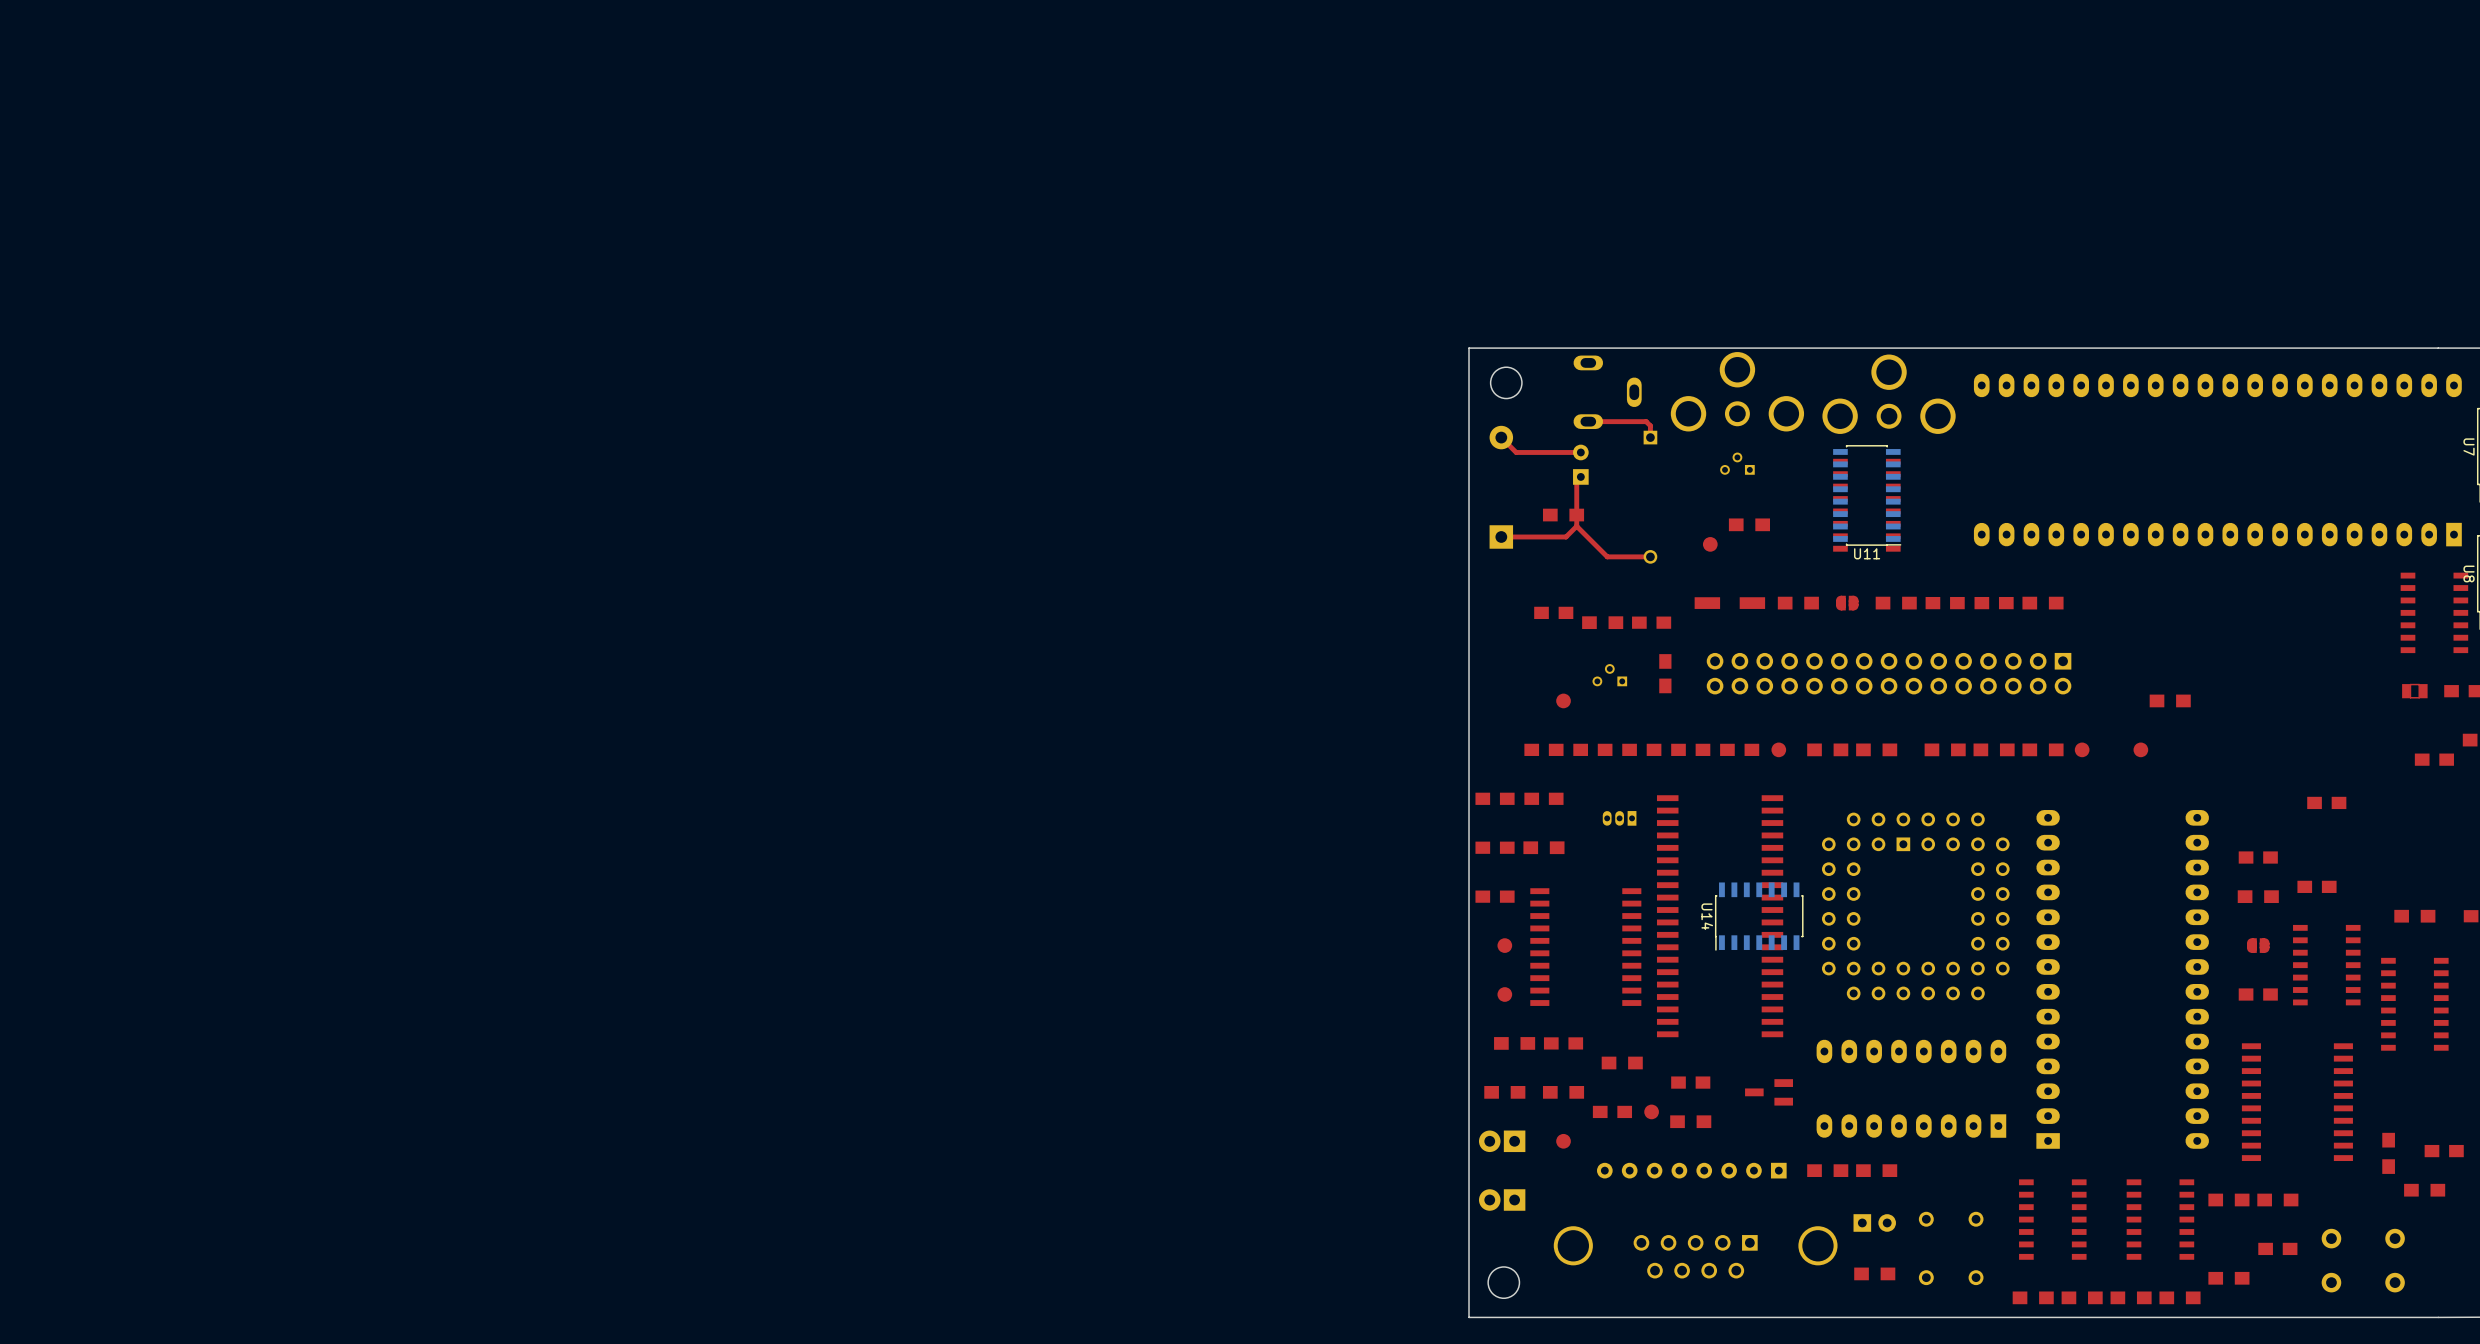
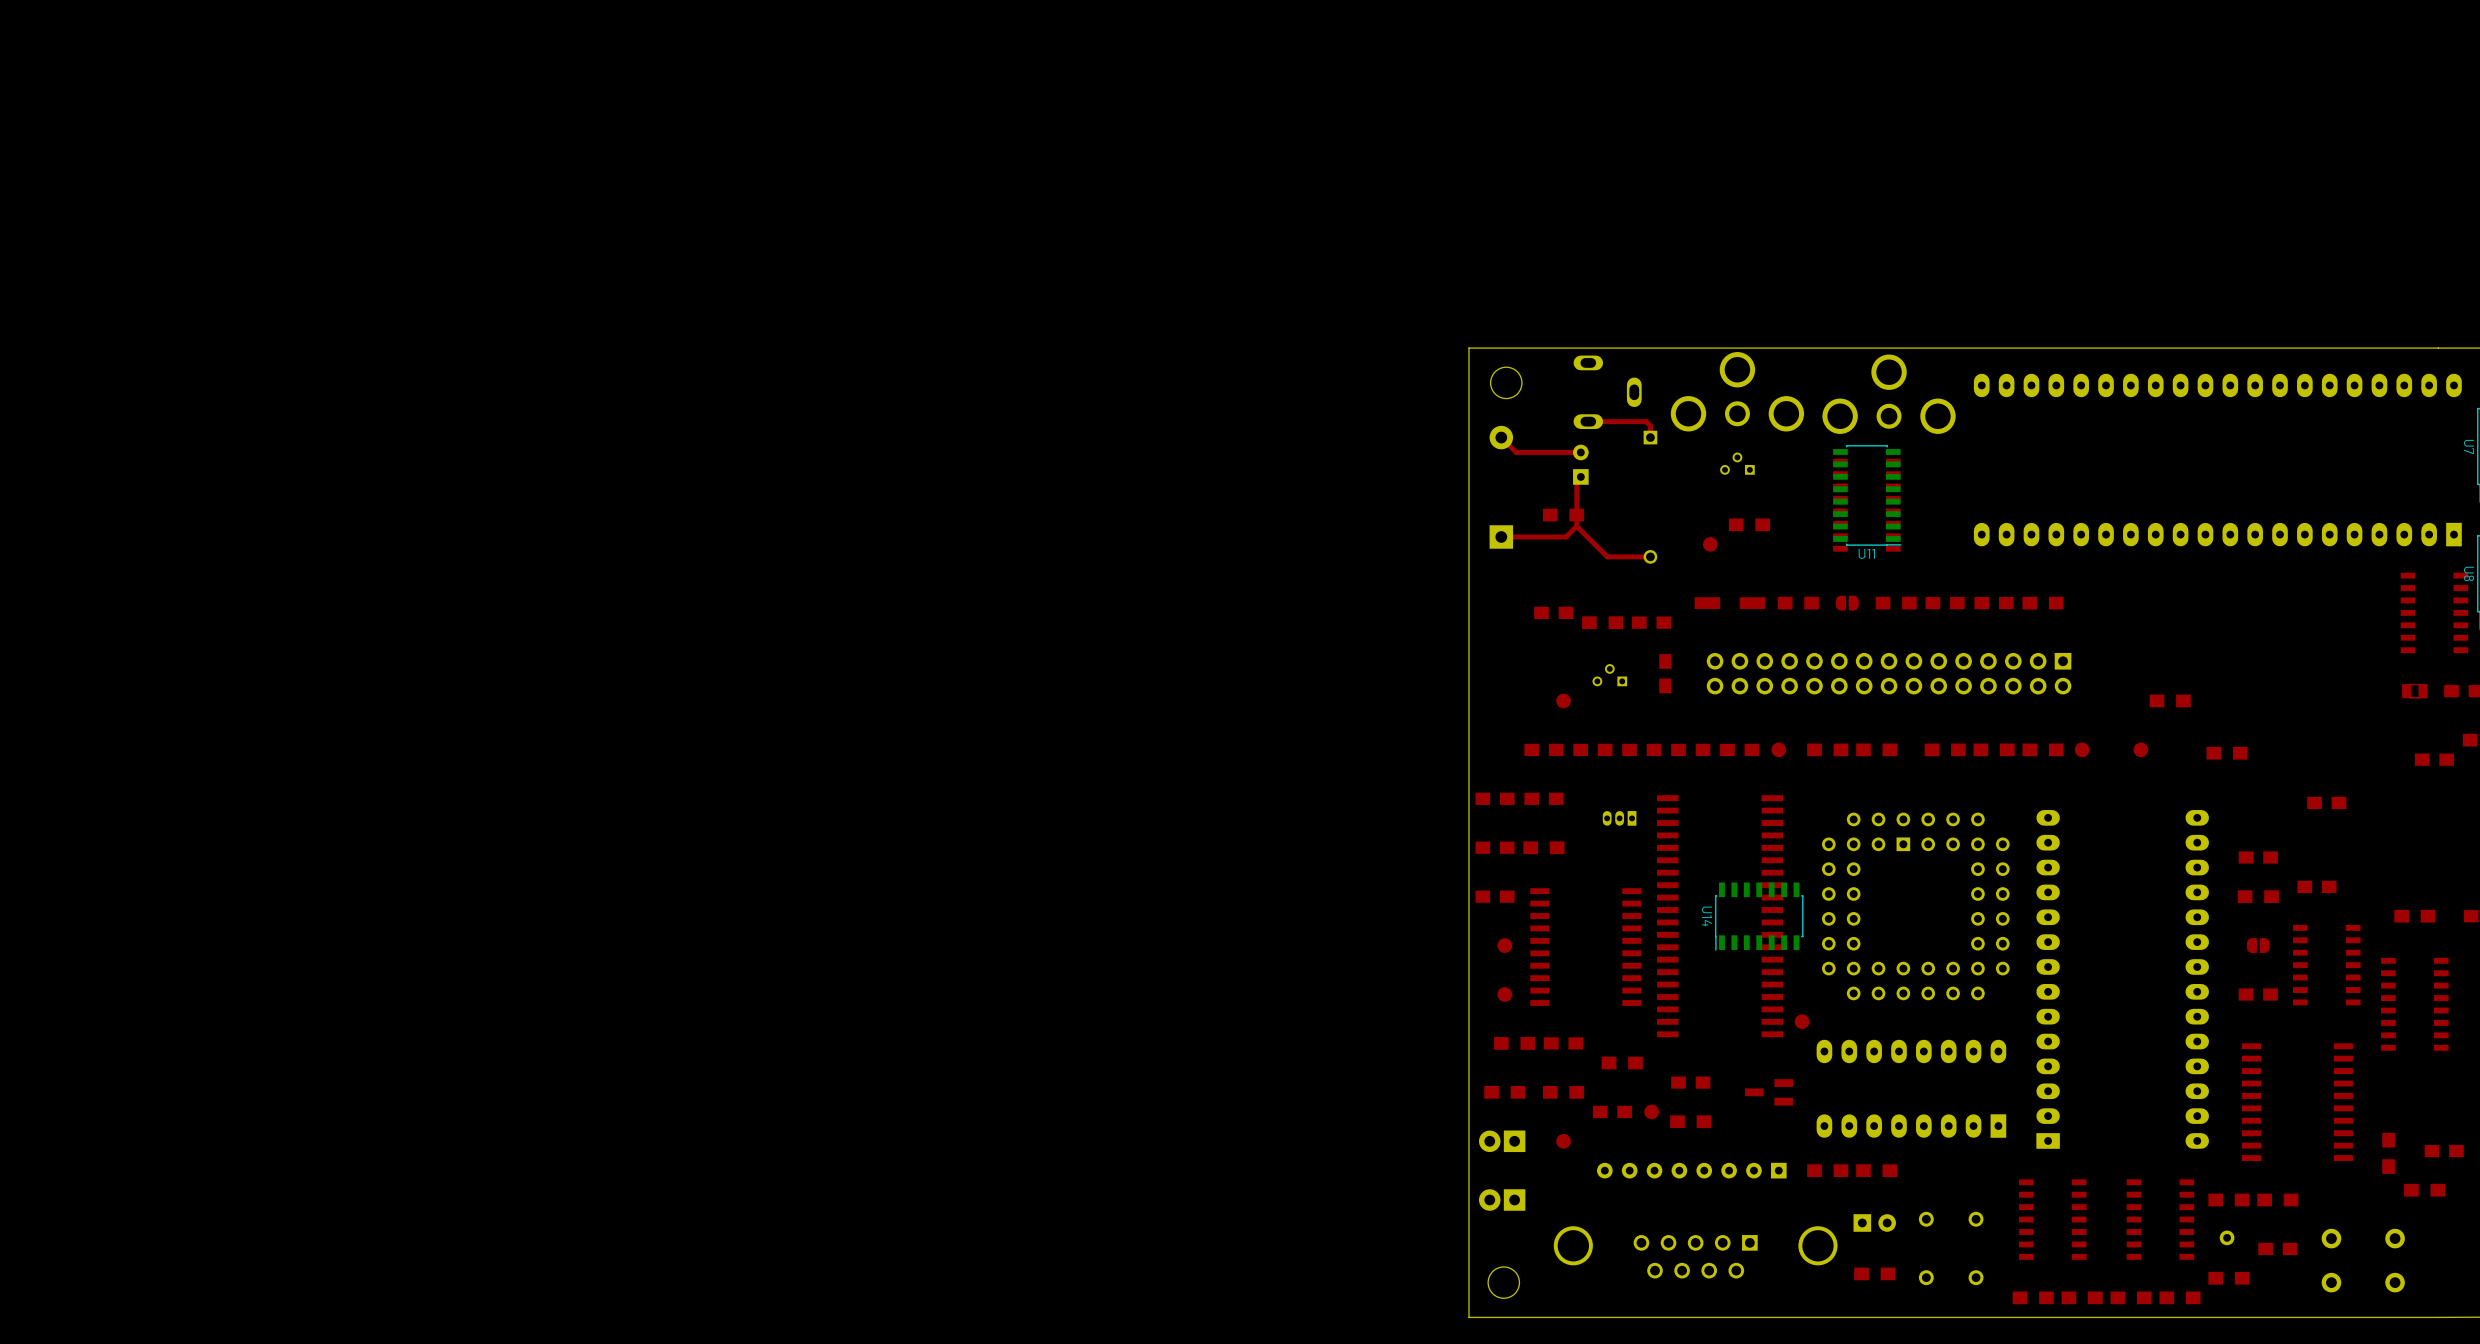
part: none -> (2227, 753)
part: none -> (1802, 1021)
part: none -> (2227, 1237)

